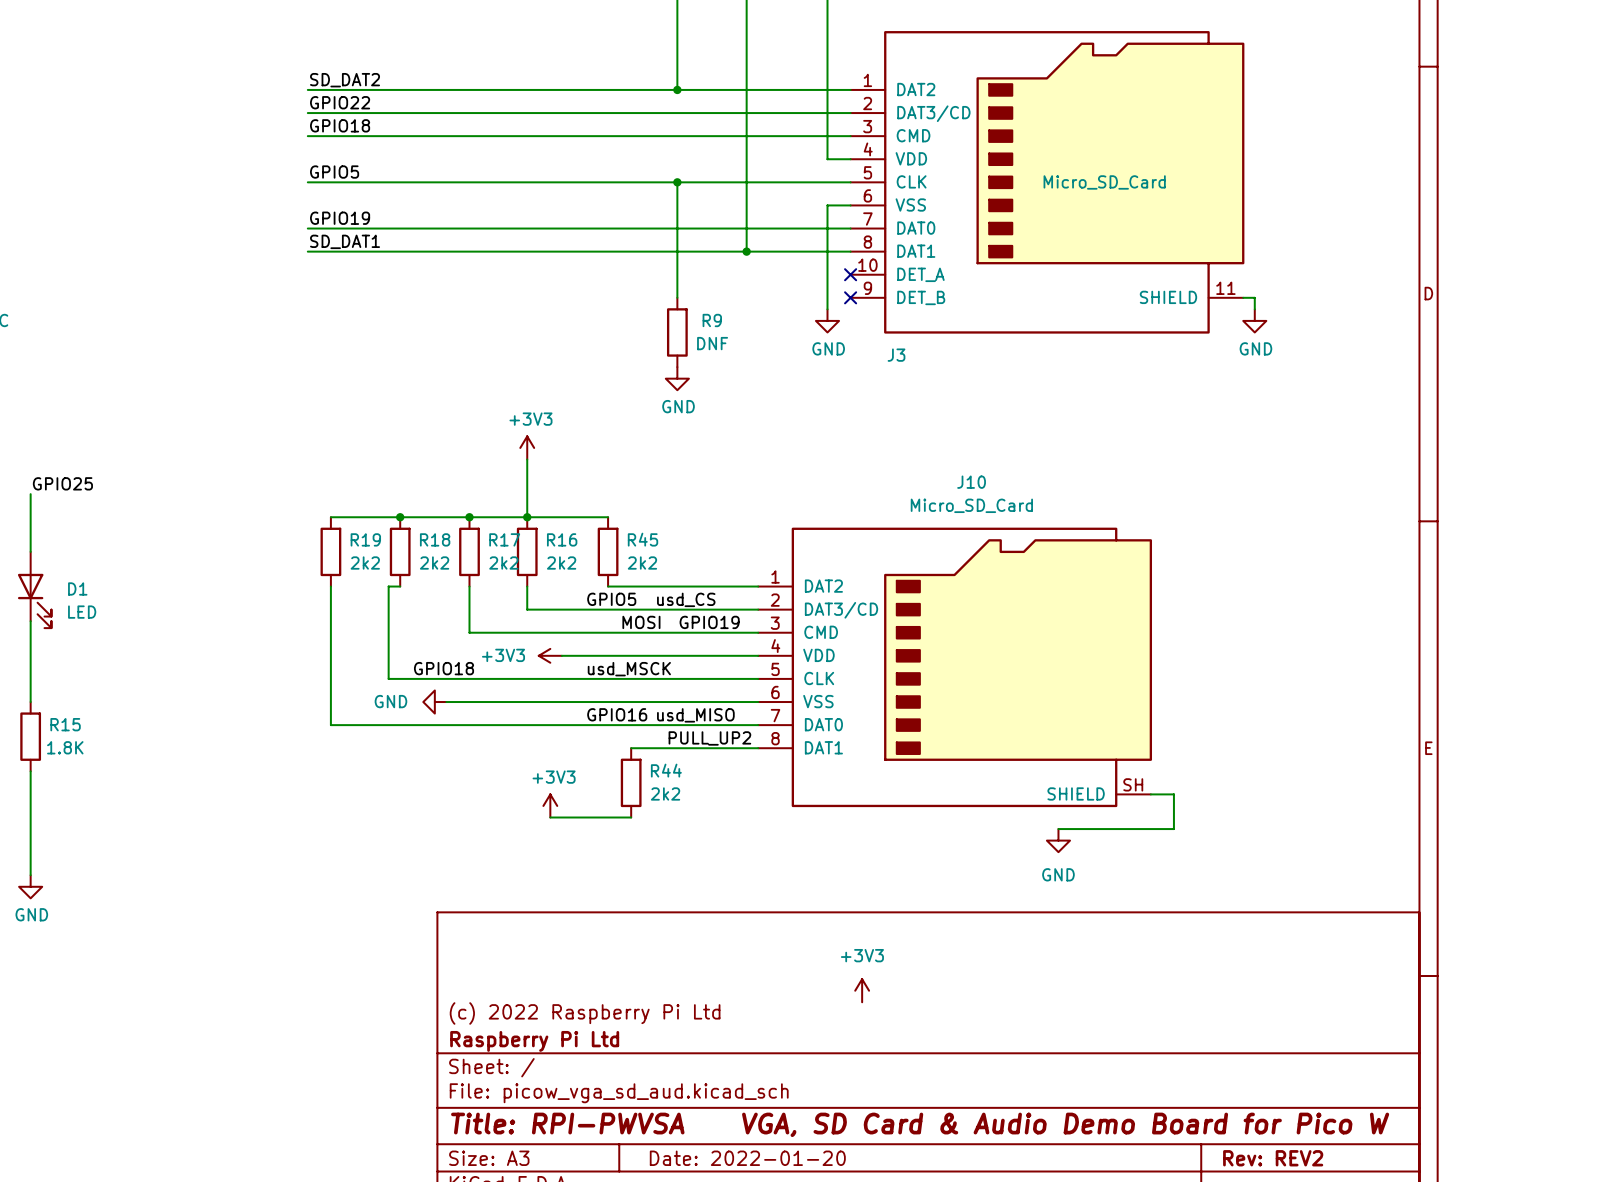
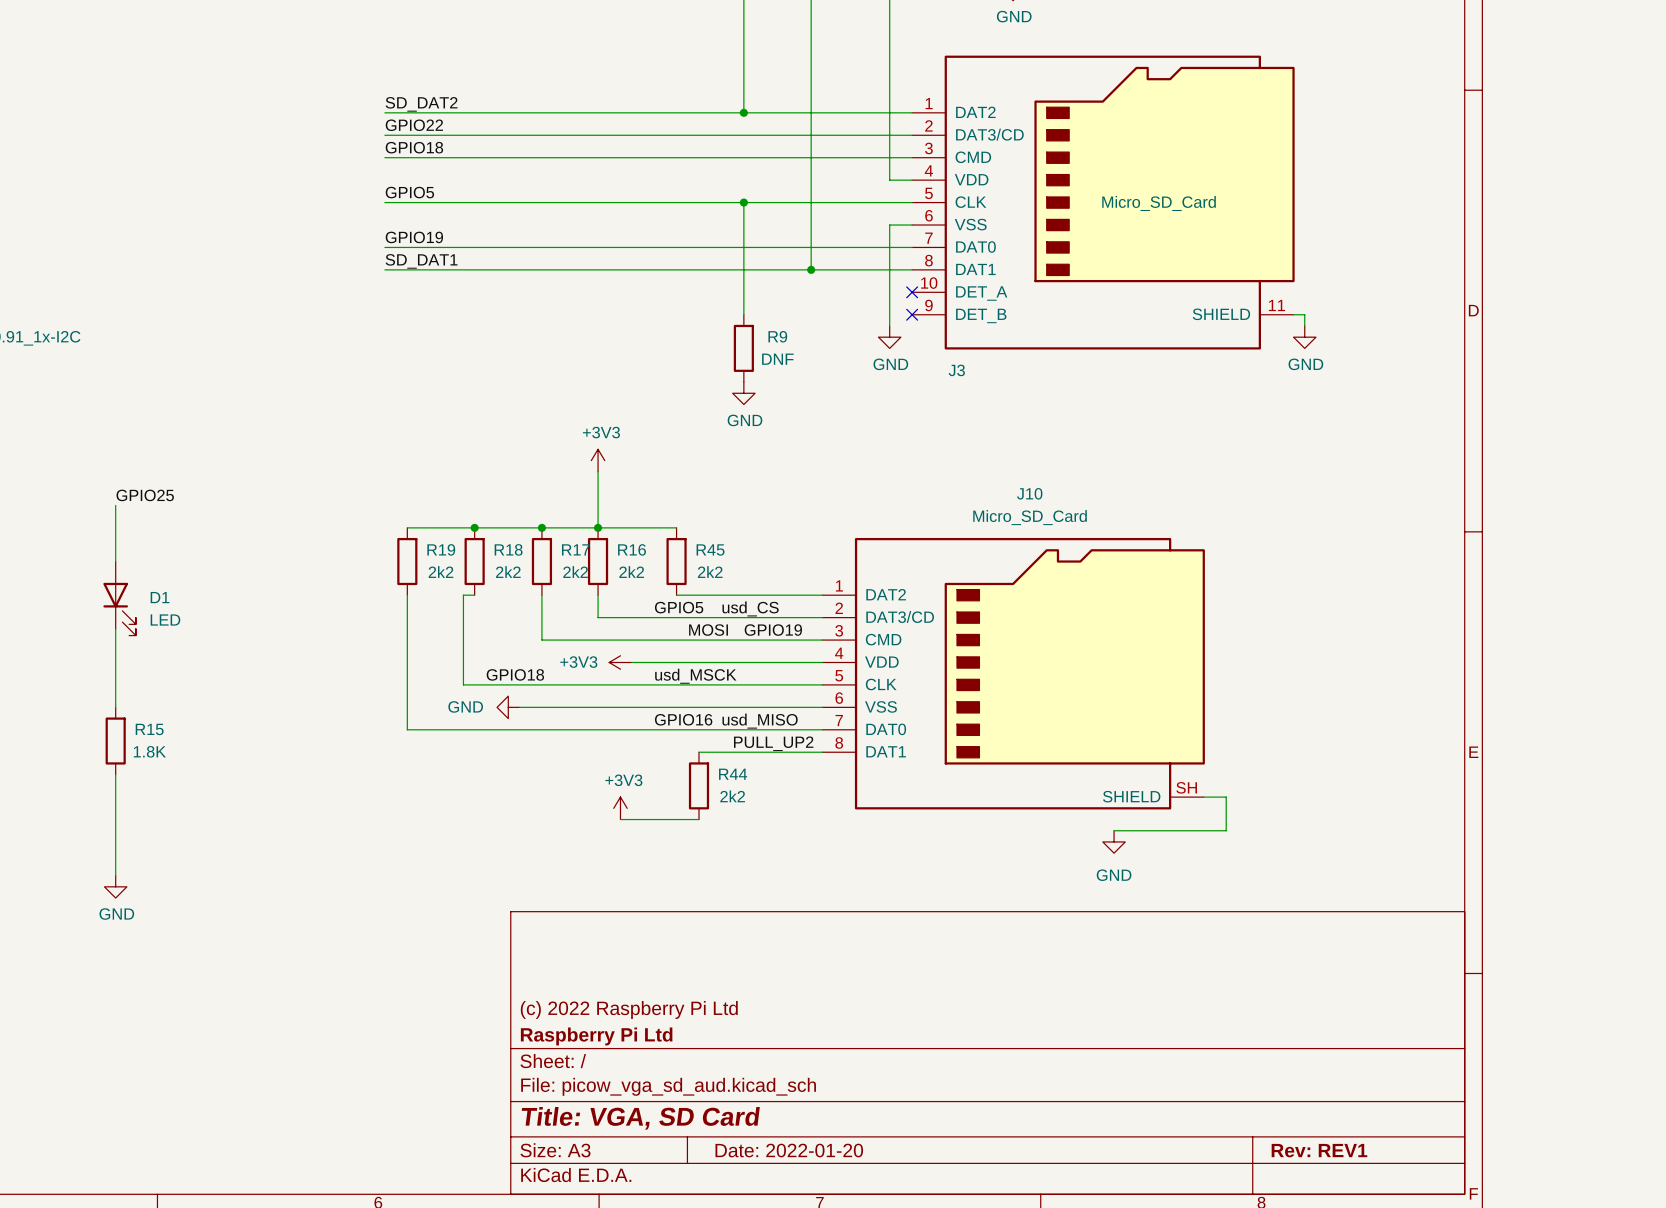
power symbol: +3V3 (862, 990) -> none
title block: Title: RPI-PWVSA VGA, SD Card & Audio Demo Board for Pico W (920, 1124) -> Title: VGA, SD Card (640, 1118)
title block: Rev: REV2 (1273, 1158) -> Rev: REV1 (1319, 1150)

